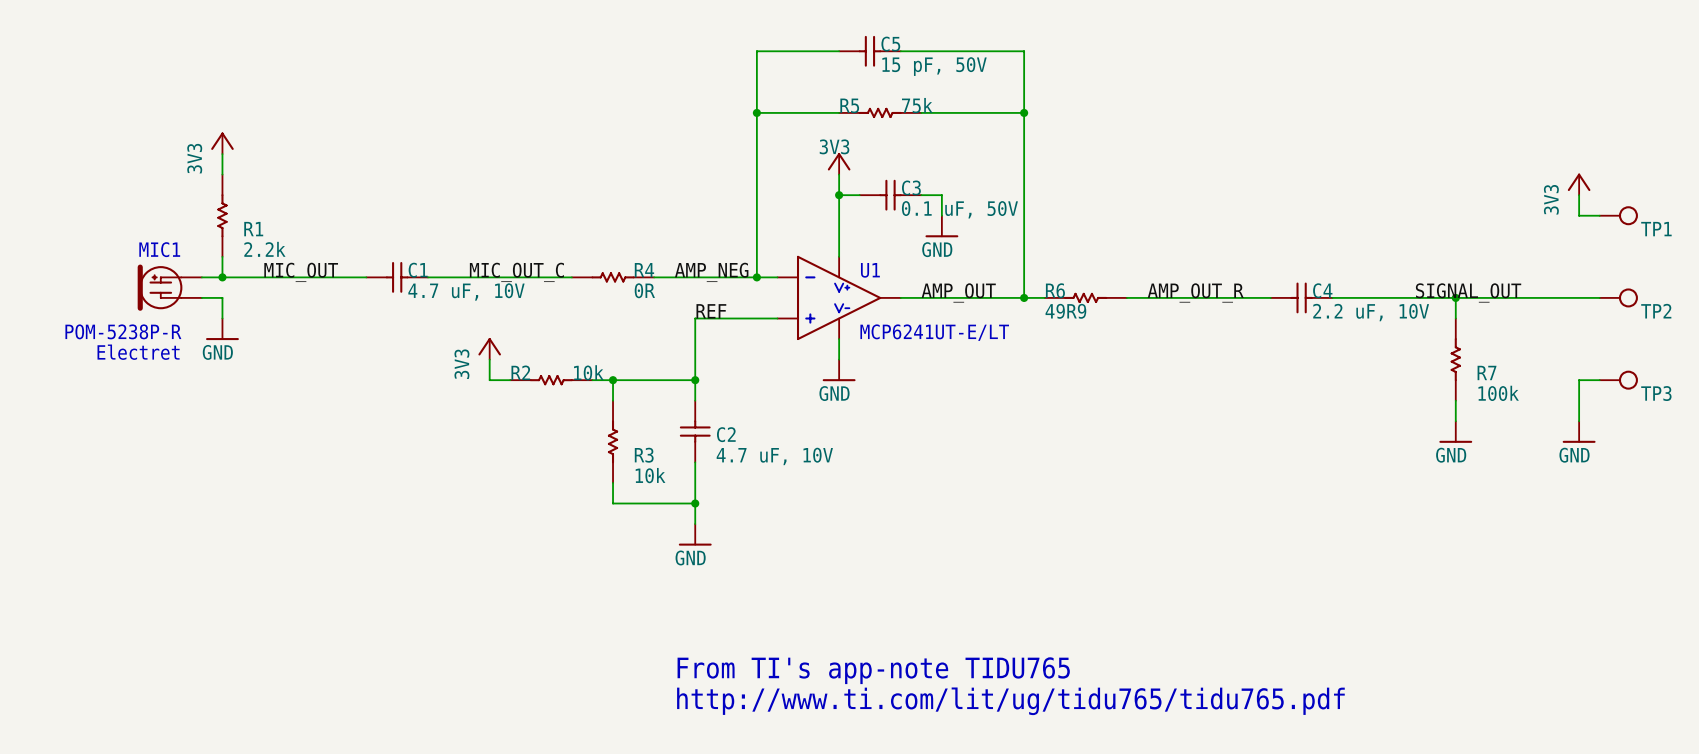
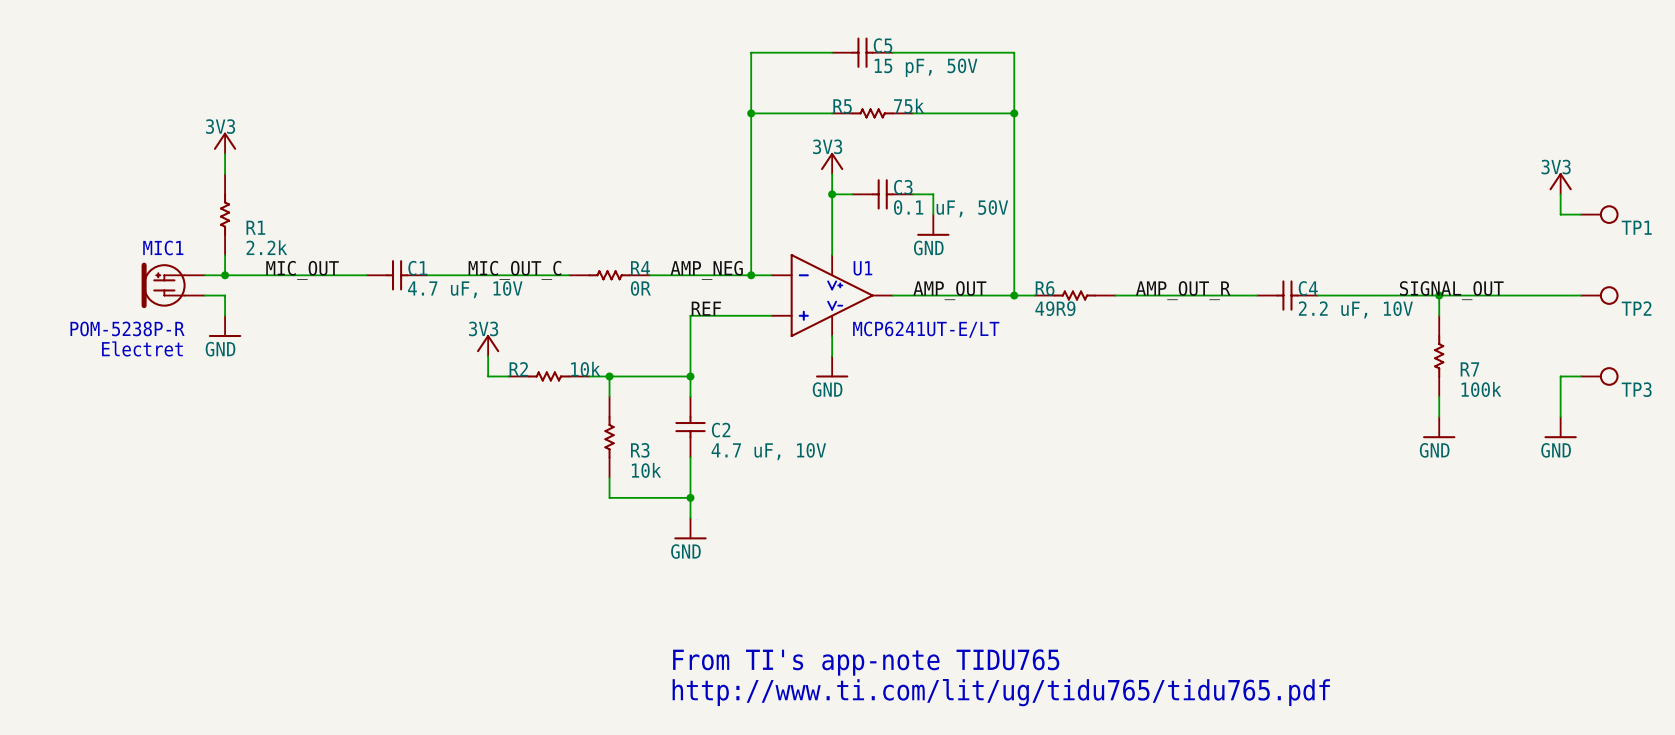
power symbol text rotation: 0° (194, 158) -> 90° clockwise (220, 126)
power symbol text rotation: 0° (1551, 199) -> 90° clockwise (1556, 167)
power symbol text rotation: 0° (461, 364) -> 90° clockwise (483, 328)

